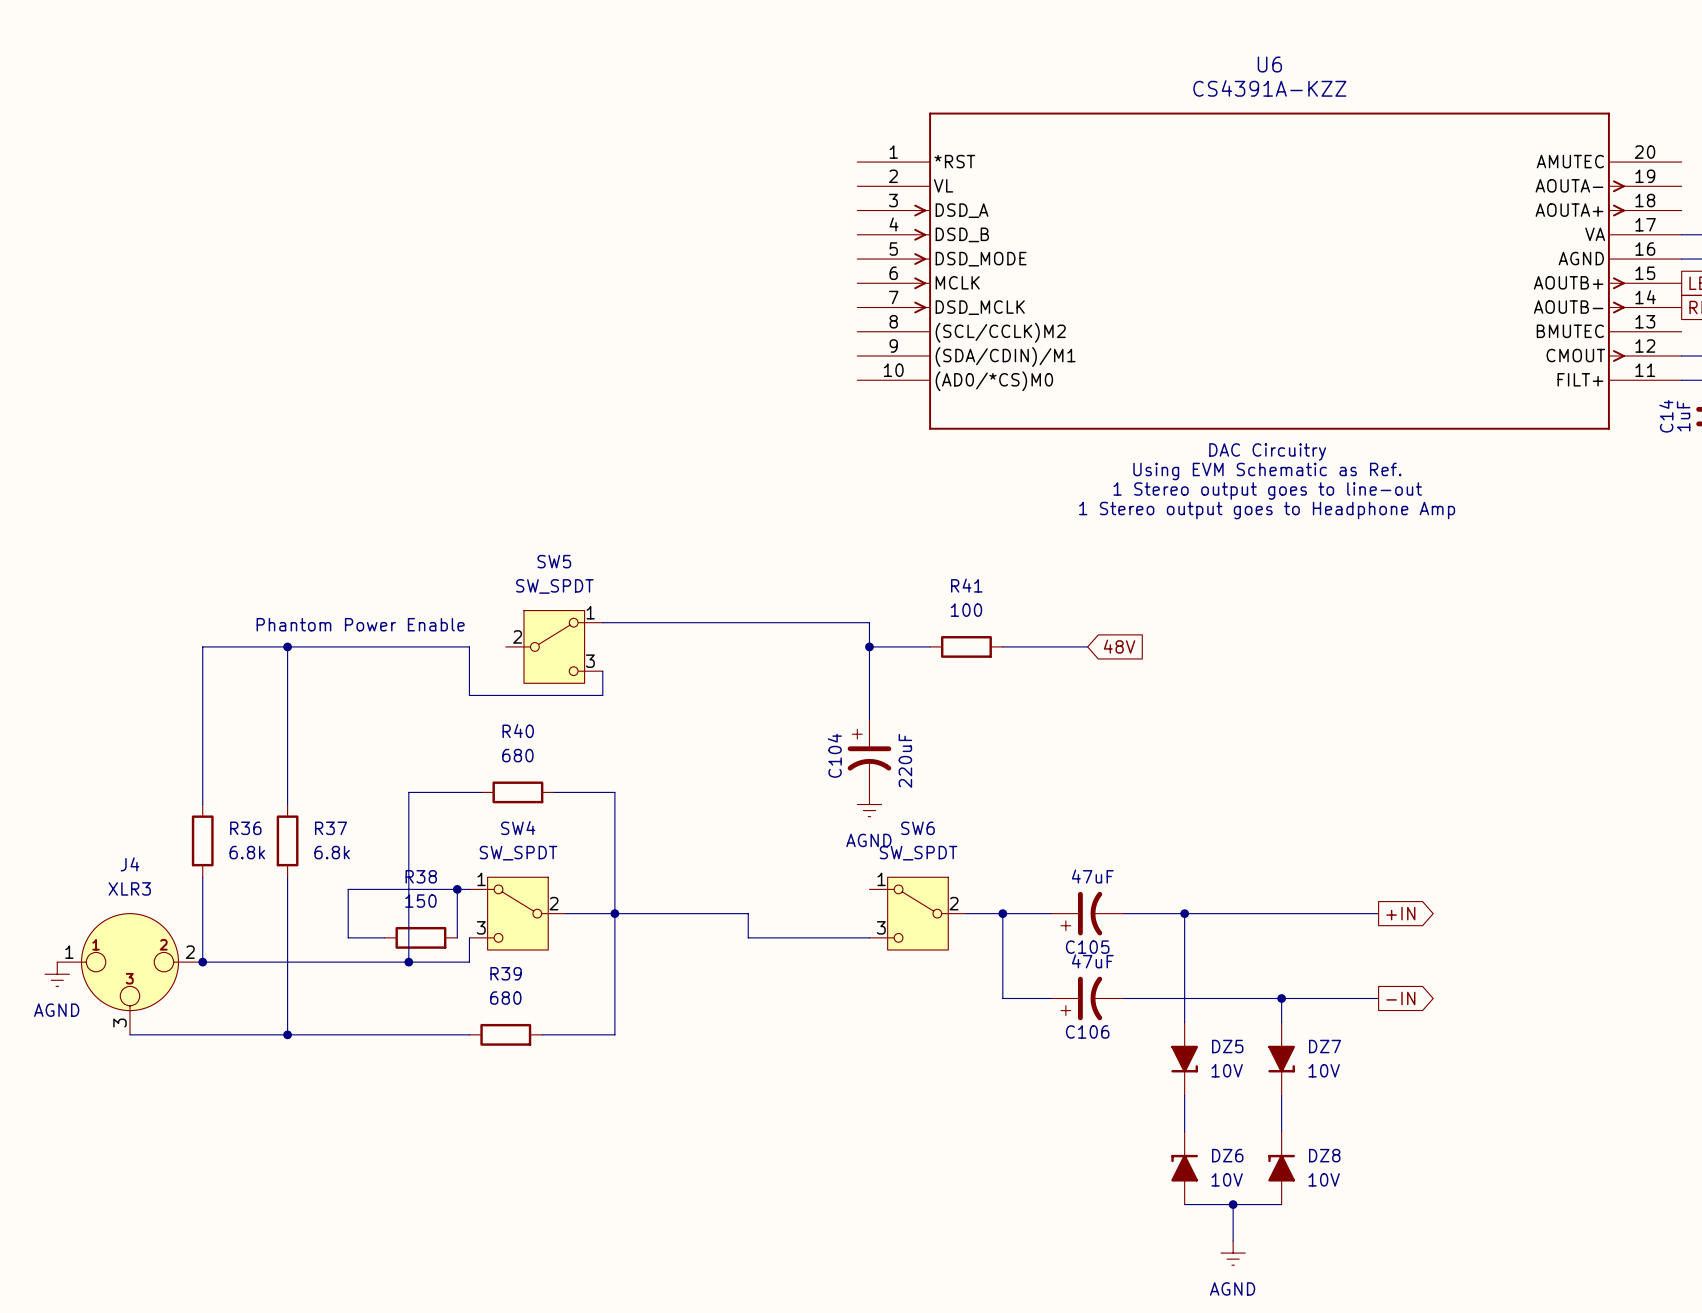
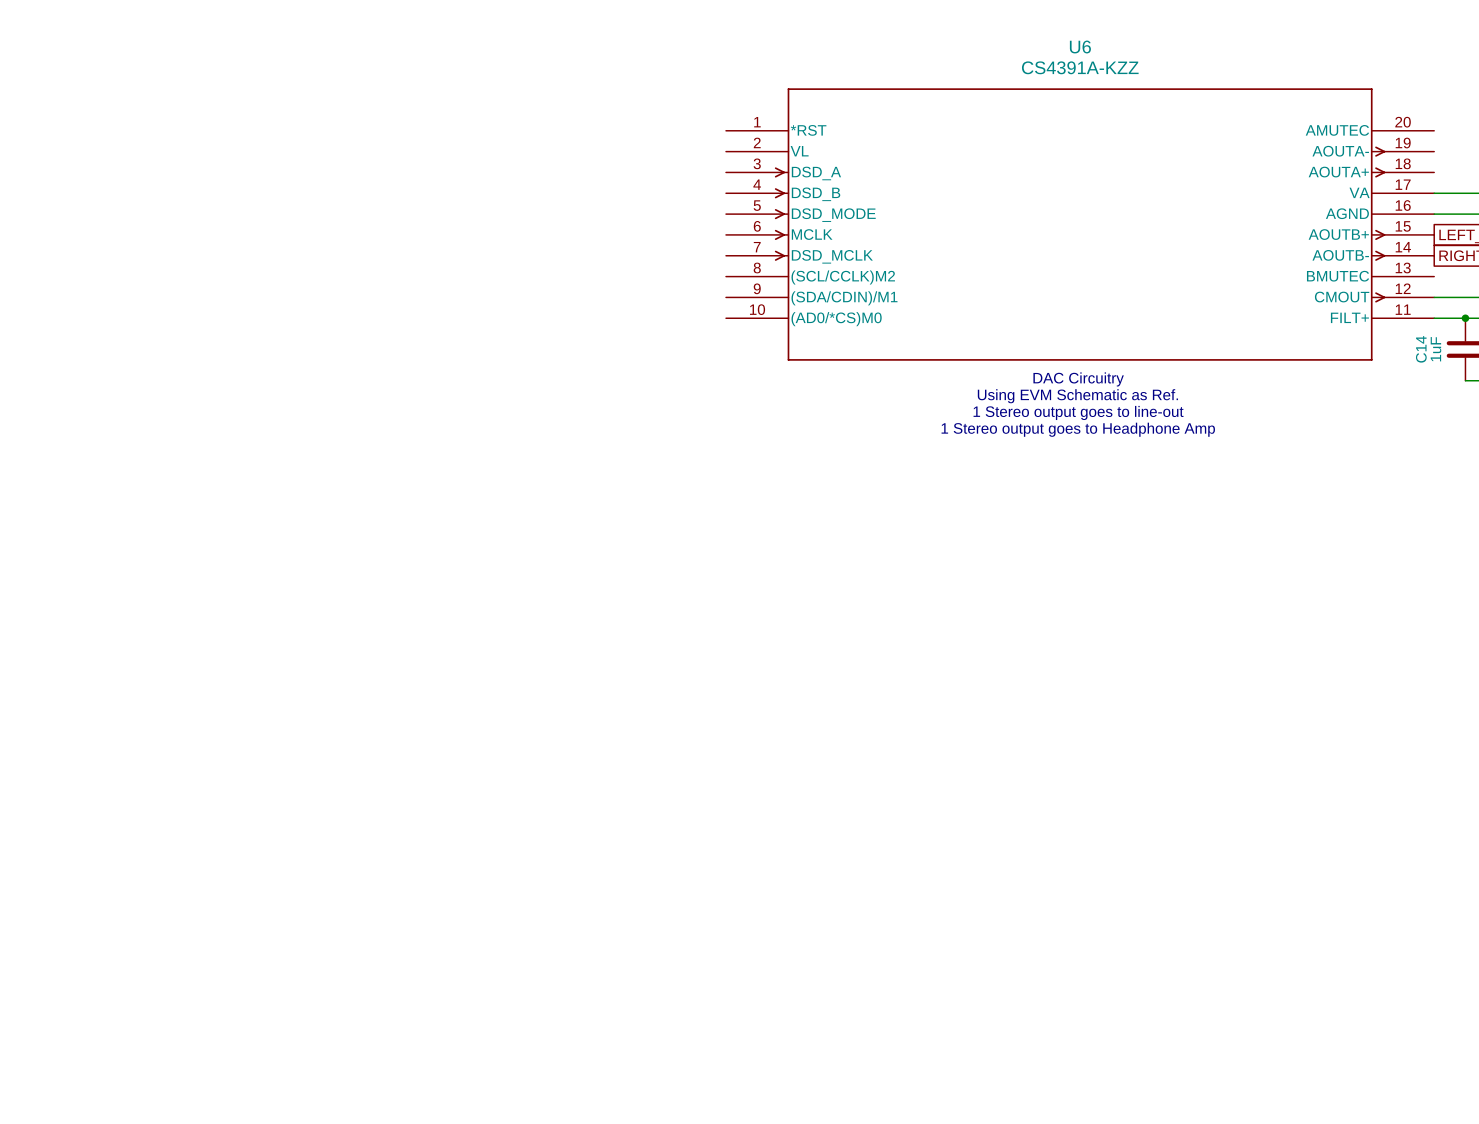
wire: (602, 622) (869, 622) (869, 719) -> none
text: Phantom Power Enable (360, 624) -> none
wire: (287, 646) (287, 804) -> none
junction: (287, 646) -> none
SW5: SW_SPDT (554, 646) -> none
wire: (869, 646) (930, 646) -> none
junction: (869, 646) -> none
R41: 100 (966, 646) -> none
wire: (1002, 646) (1087, 646) -> none
global label: 48V (1119, 646) -> none
wire: (602, 671) (602, 695) (469, 695) (469, 646) (202, 646) (202, 804) -> none
C104: 220uF (869, 756) -> none
wire: (481, 792) (408, 792) (408, 962) -> none
R40: 680 (517, 792) -> none
wire: (554, 792) (614, 792) (614, 1034) (542, 1034) -> none
power symbol: AGND (869, 804) -> none
R36: 6.8k (202, 840) -> none
R37: 6.8k (287, 840) -> none
wire: (202, 877) (202, 962) (469, 962) (469, 937) -> none
wire: (287, 877) (287, 1034) -> none
wire: (457, 889) (457, 937) -> none
junction: (457, 889) -> none
wire: (469, 889) (348, 889) (348, 937) (384, 937) -> none
SW4: SW_SPDT (517, 913) -> none
wire: (566, 913) (748, 913) (748, 937) (869, 937) -> none
junction: (614, 913) -> none
SW6: SW_SPDT (917, 913) -> none
wire: (966, 913) (1051, 913) -> none
wire: (1002, 913) (1002, 998) (1051, 998) -> none
junction: (1002, 913) -> none
C105: 47uF (1087, 913) -> none
wire: (1124, 913) (1378, 913) -> none
wire: (1184, 913) (1184, 1022) -> none
junction: (1184, 913) -> none
global label: +IN (1400, 913) -> none
R38: 150 (420, 937) -> none
junction: (202, 962) -> none
junction: (408, 962) -> none
power symbol: AGND (57, 974) -> none
J4: XLR3 (130, 974) -> none
C106: 47uF (1087, 998) -> none
wire: (1124, 998) (1378, 998) -> none
wire: (1281, 998) (1281, 1022) -> none
junction: (1281, 998) -> none
global label: -IN (1400, 998) -> none
wire: (130, 1034) (469, 1034) -> none
junction: (287, 1034) -> none
R39: 680 (505, 1034) -> none
DZ5: 10V (1184, 1059) -> none
DZ7: 10V (1281, 1059) -> none
wire: (1184, 1095) (1184, 1131) -> none
wire: (1281, 1095) (1281, 1131) -> none
DZ6: 10V (1184, 1168) -> none
DZ8: 10V (1281, 1168) -> none
wire: (1184, 1204) (1281, 1204) -> none
wire: (1233, 1204) (1233, 1240) -> none
junction: (1233, 1204) -> none
power symbol: AGND (1233, 1253) -> none

